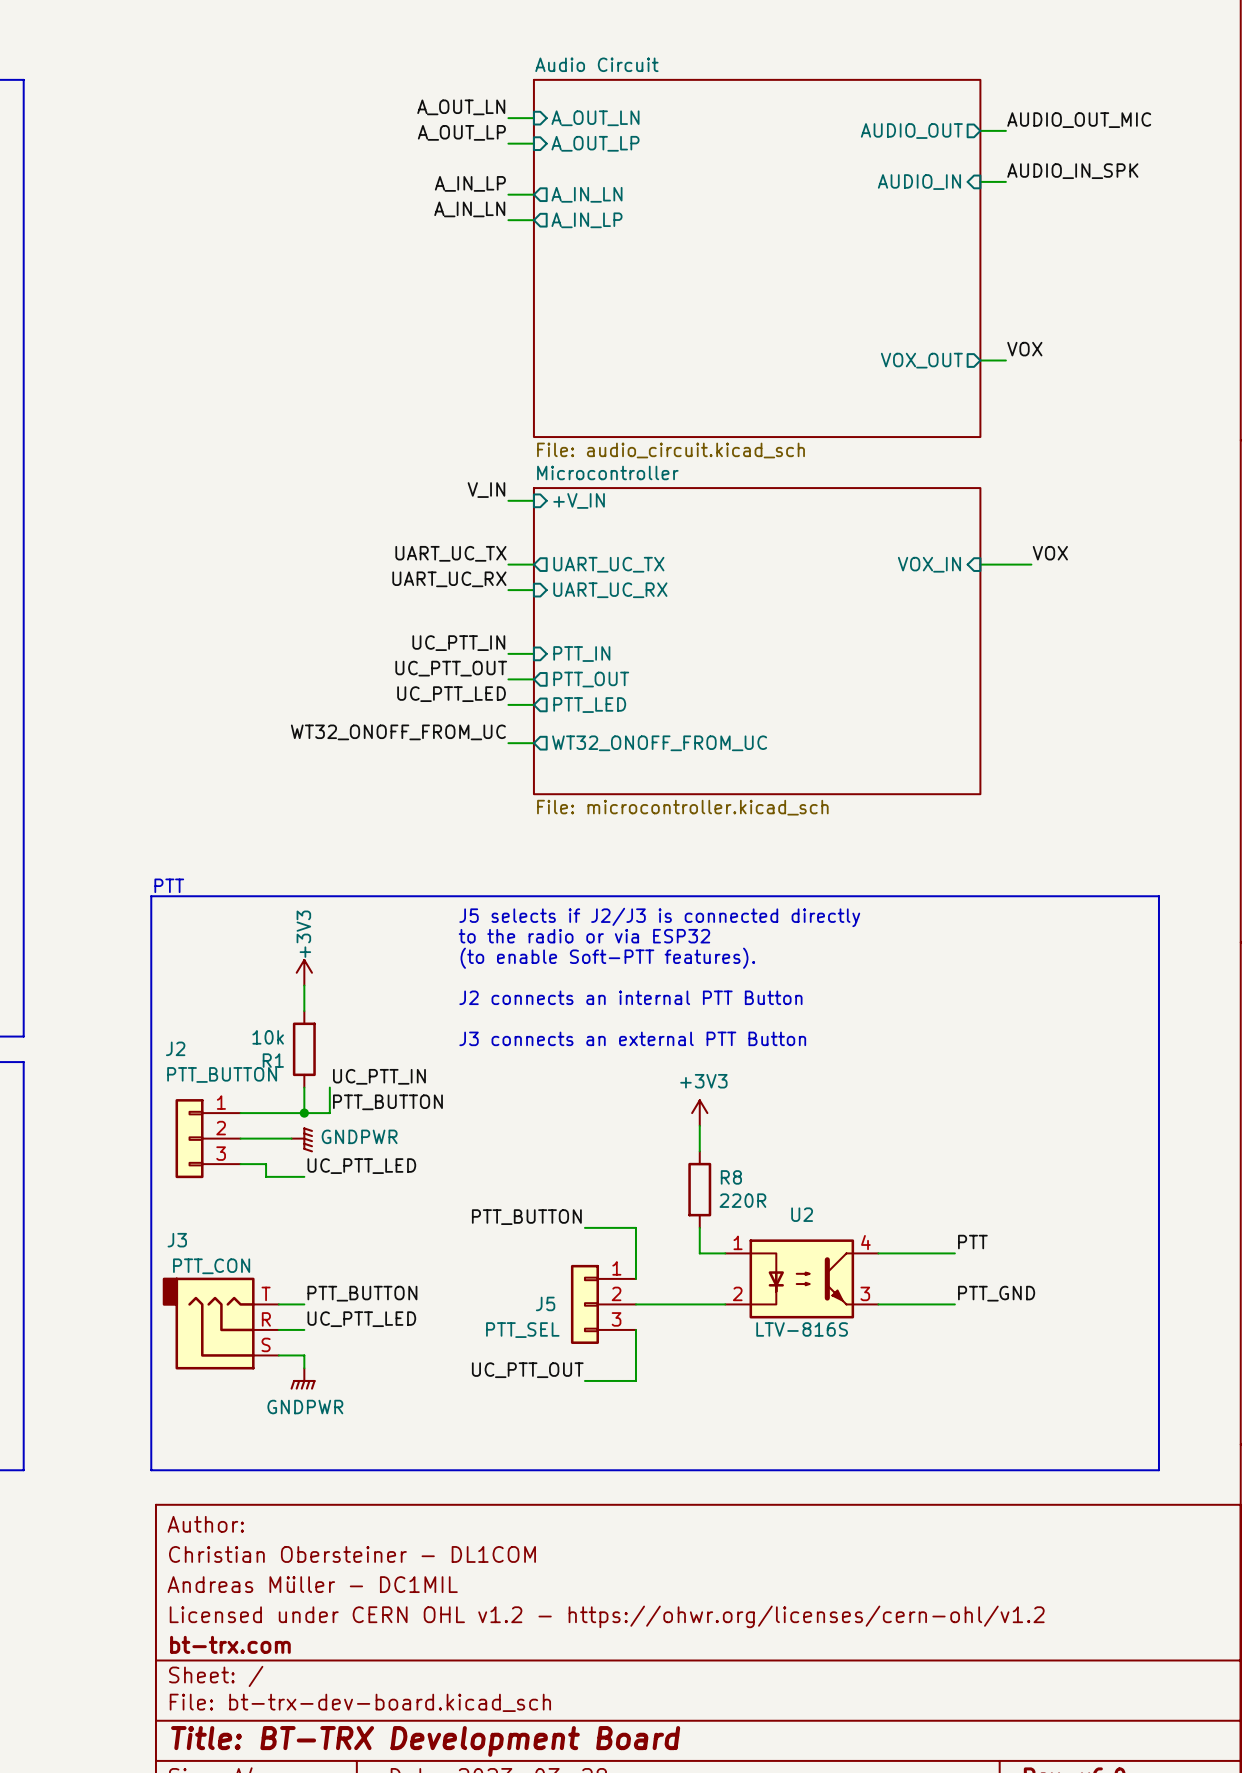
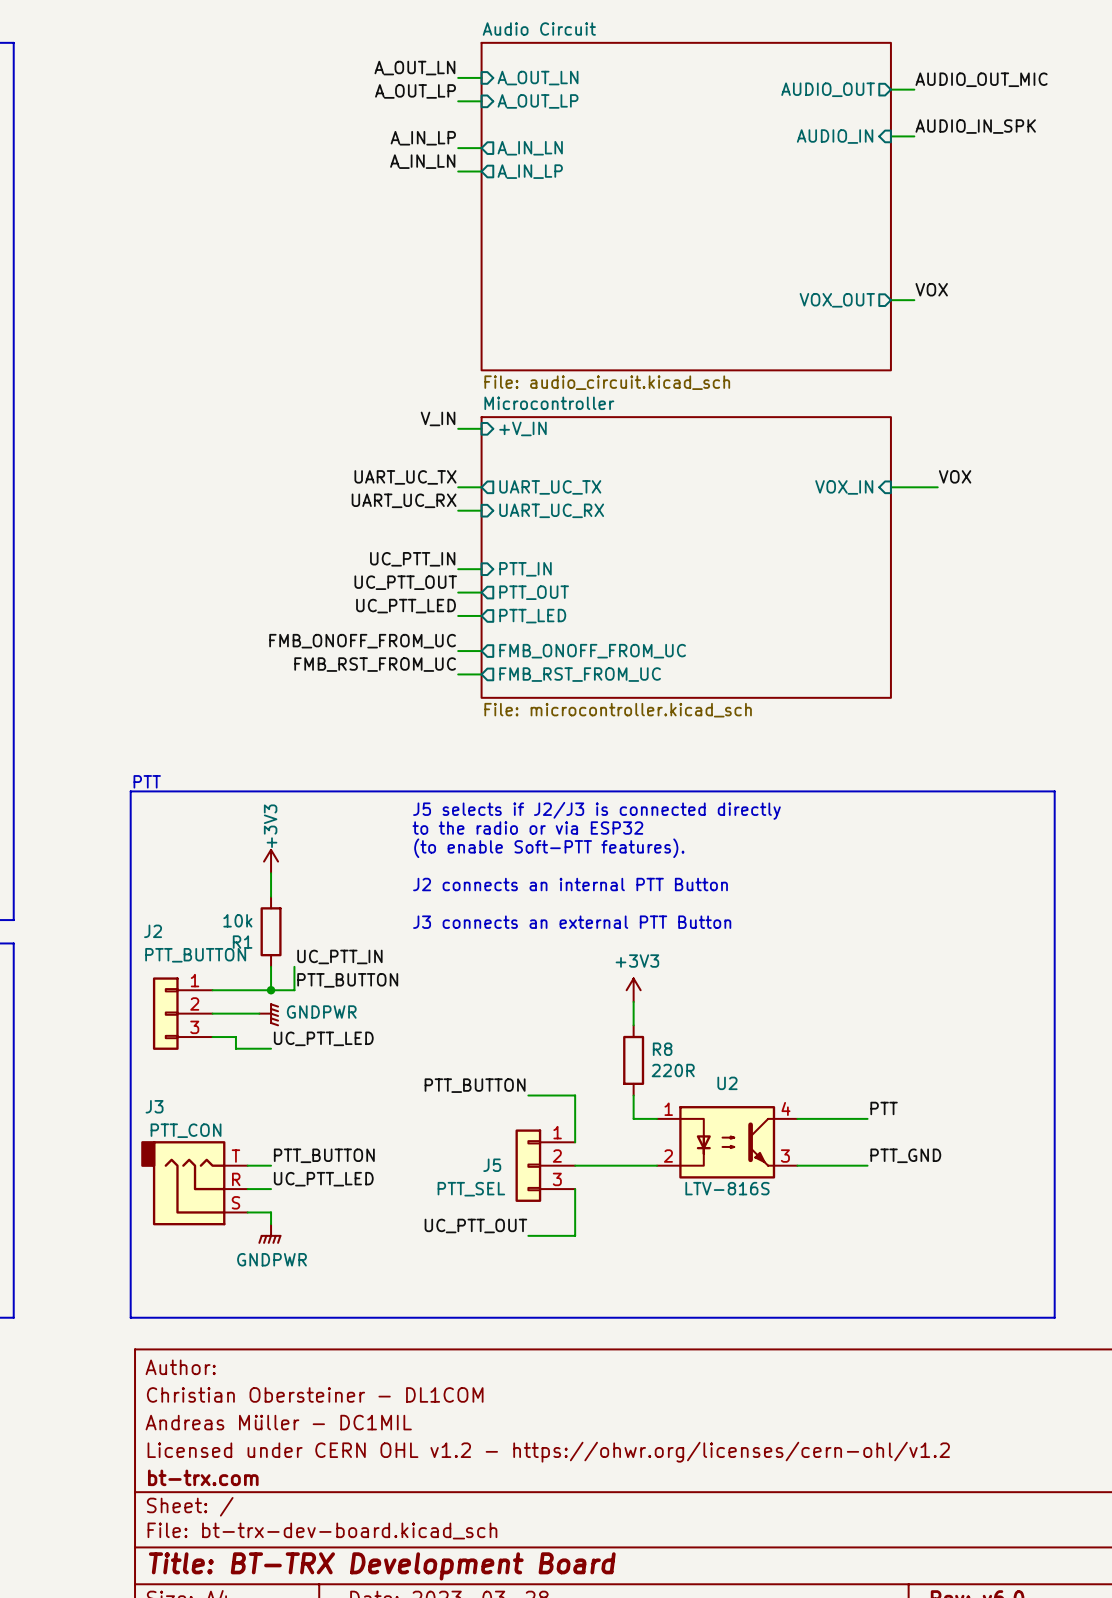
label: WT32_ONOFF_FROM_UC (398, 732) -> FMB_ONOFF_FROM_UC (362, 641)
sheet pin: WT32_ONOFF_FROM_UC (659, 743) -> FMB_ONOFF_FROM_UC (592, 651)
label: none -> FMB_RST_FROM_UC (375, 664)
wire: none -> (458, 674) (481, 674)
sheet pin: none -> FMB_RST_FROM_UC (580, 674)

